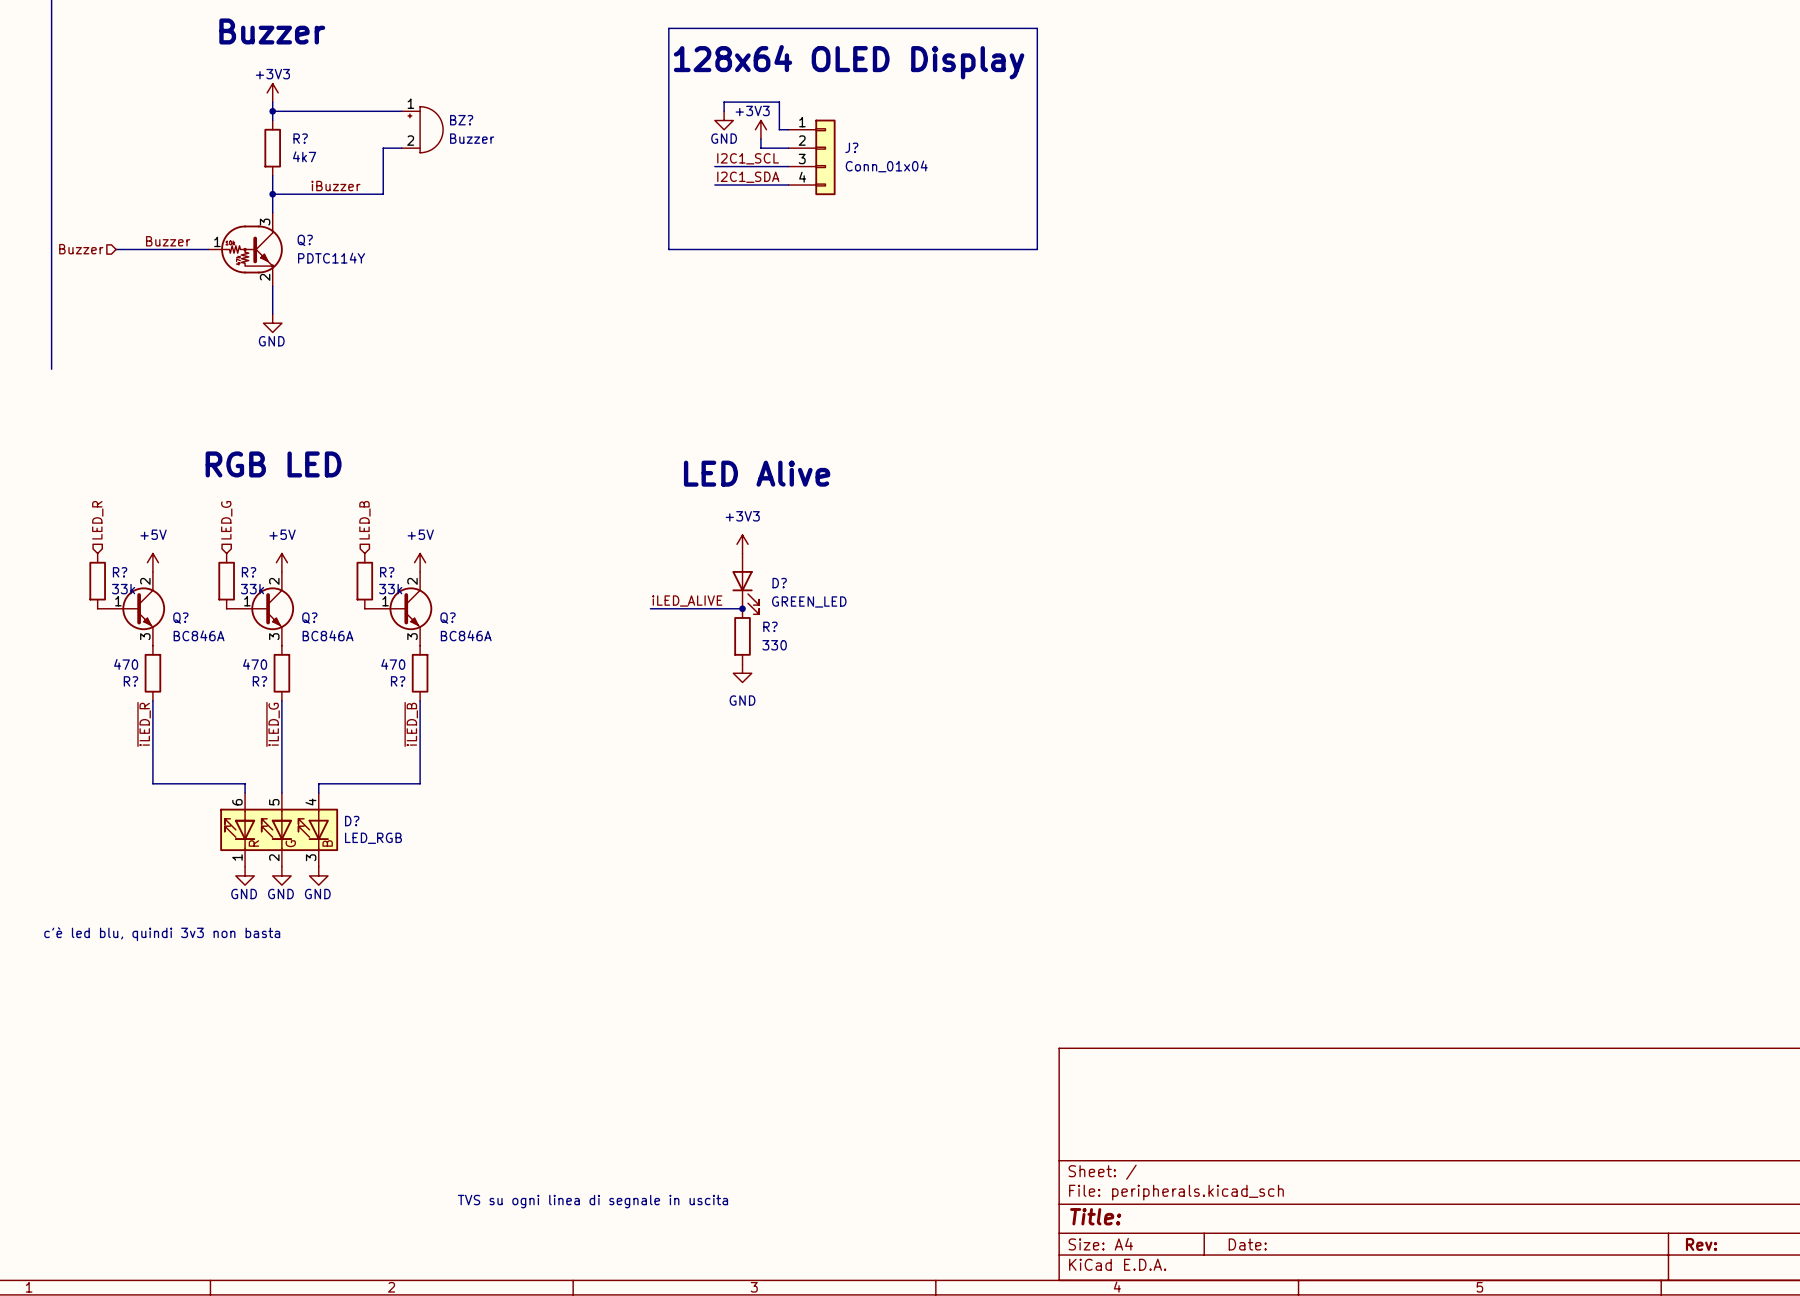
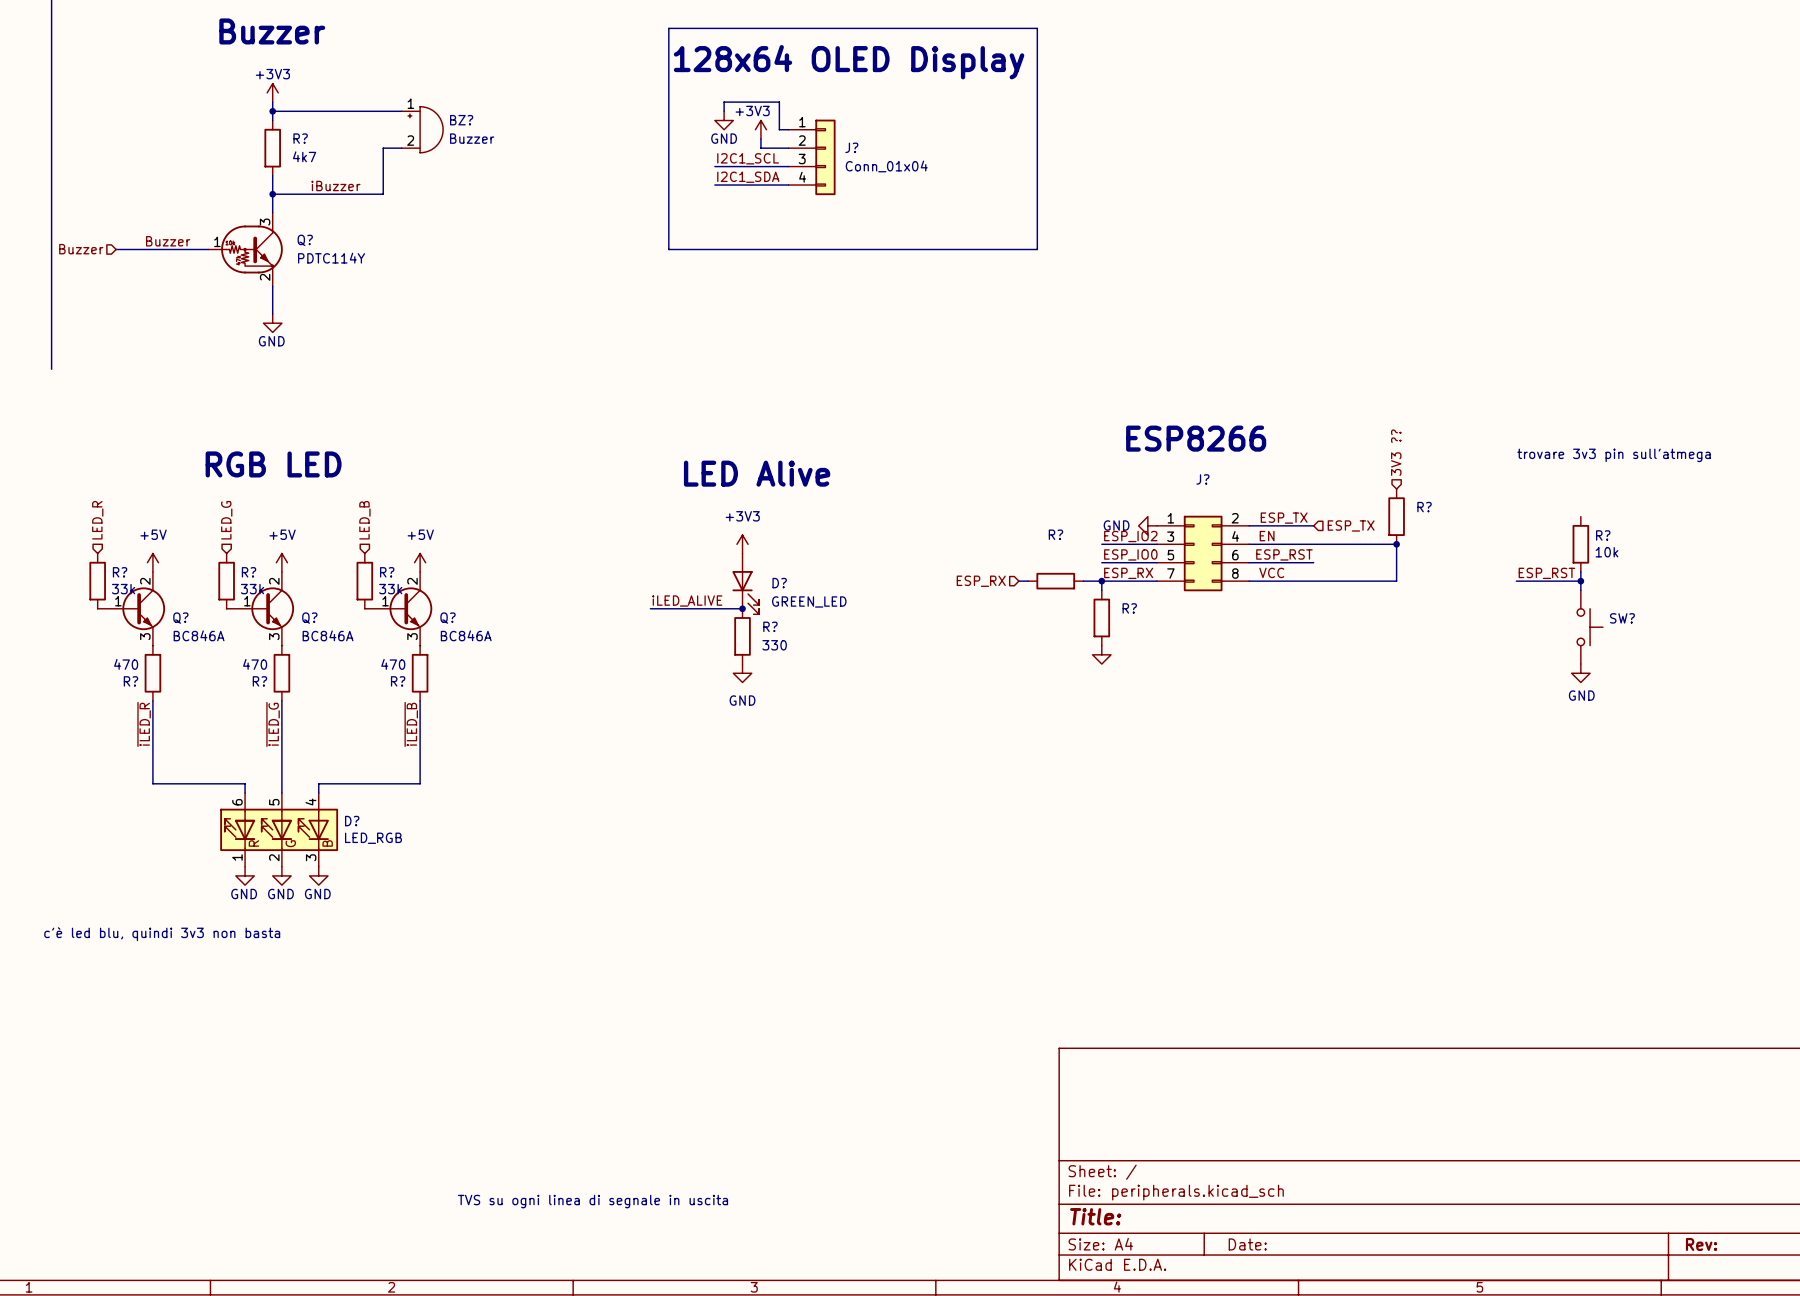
text: none -> ESP8266 (1196, 438)
hierarchical label: none -> 3V3 ?? (1396, 452)
text: none -> trovare 3v3 pin sull'atmega (1614, 455)
R?: none -> (1396, 516)
label: none -> ESP_TX (1284, 518)
power symbol: none -> GND (1147, 525)
wire: none -> (1249, 525) (1313, 525)
hierarchical label: none -> ESP_TX (1351, 525)
label: none -> ESP_IO2 (1130, 536)
label: none -> EN (1267, 536)
wire: none -> (1101, 544) (1157, 544)
wire: none -> (1249, 544) (1396, 544) (1396, 581) (1249, 581)
junction: none -> (1396, 544)
R?: none -> 10k (1580, 544)
J?: none -> (1203, 553)
label: none -> ESP_IO0 (1130, 554)
label: none -> ESP_RST (1284, 554)
wire: none -> (1101, 562) (1157, 562)
wire: none -> (1249, 562) (1313, 562)
wire: none -> (1580, 571) (1580, 590)
label: none -> VCC (1271, 572)
label: none -> ESP_RX (1128, 573)
label: none -> ESP_RST (1546, 573)
hierarchical label: none -> ESP_RX (981, 581)
wire: none -> (1018, 581) (1028, 581)
R?: none -> (1055, 581)
wire: none -> (1083, 581) (1157, 581)
wire: none -> (1101, 581) (1101, 590)
junction: none -> (1101, 581)
wire: none -> (1516, 581) (1580, 581)
junction: none -> (1580, 581)
R?: none -> (1101, 617)
SW?: none -> (1590, 627)
power symbol: none -> (1101, 654)
power symbol: none -> GND (1580, 673)

